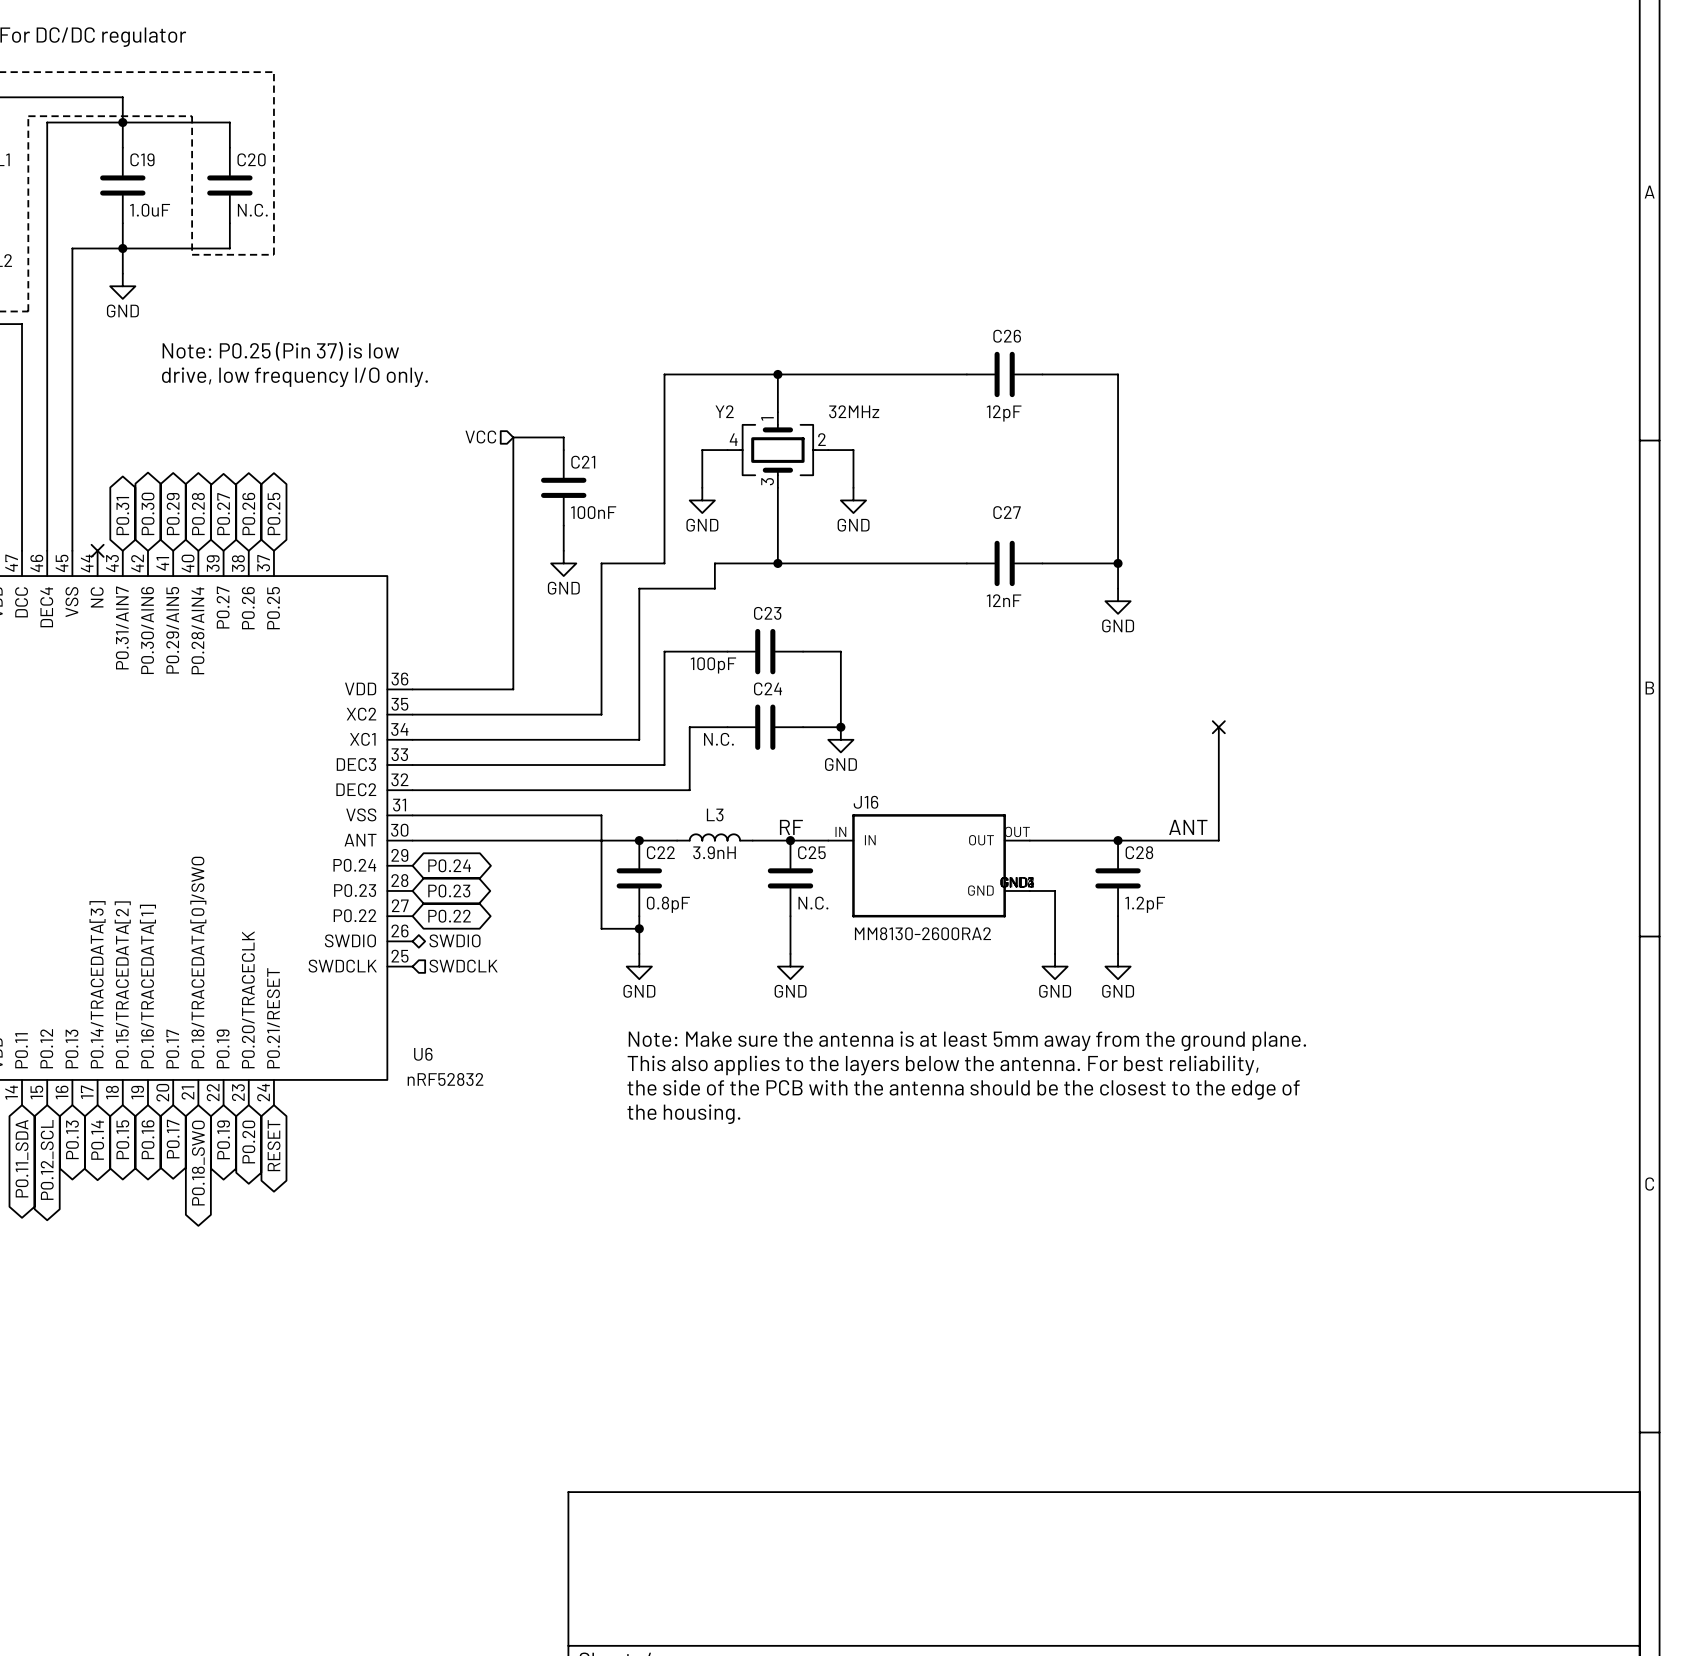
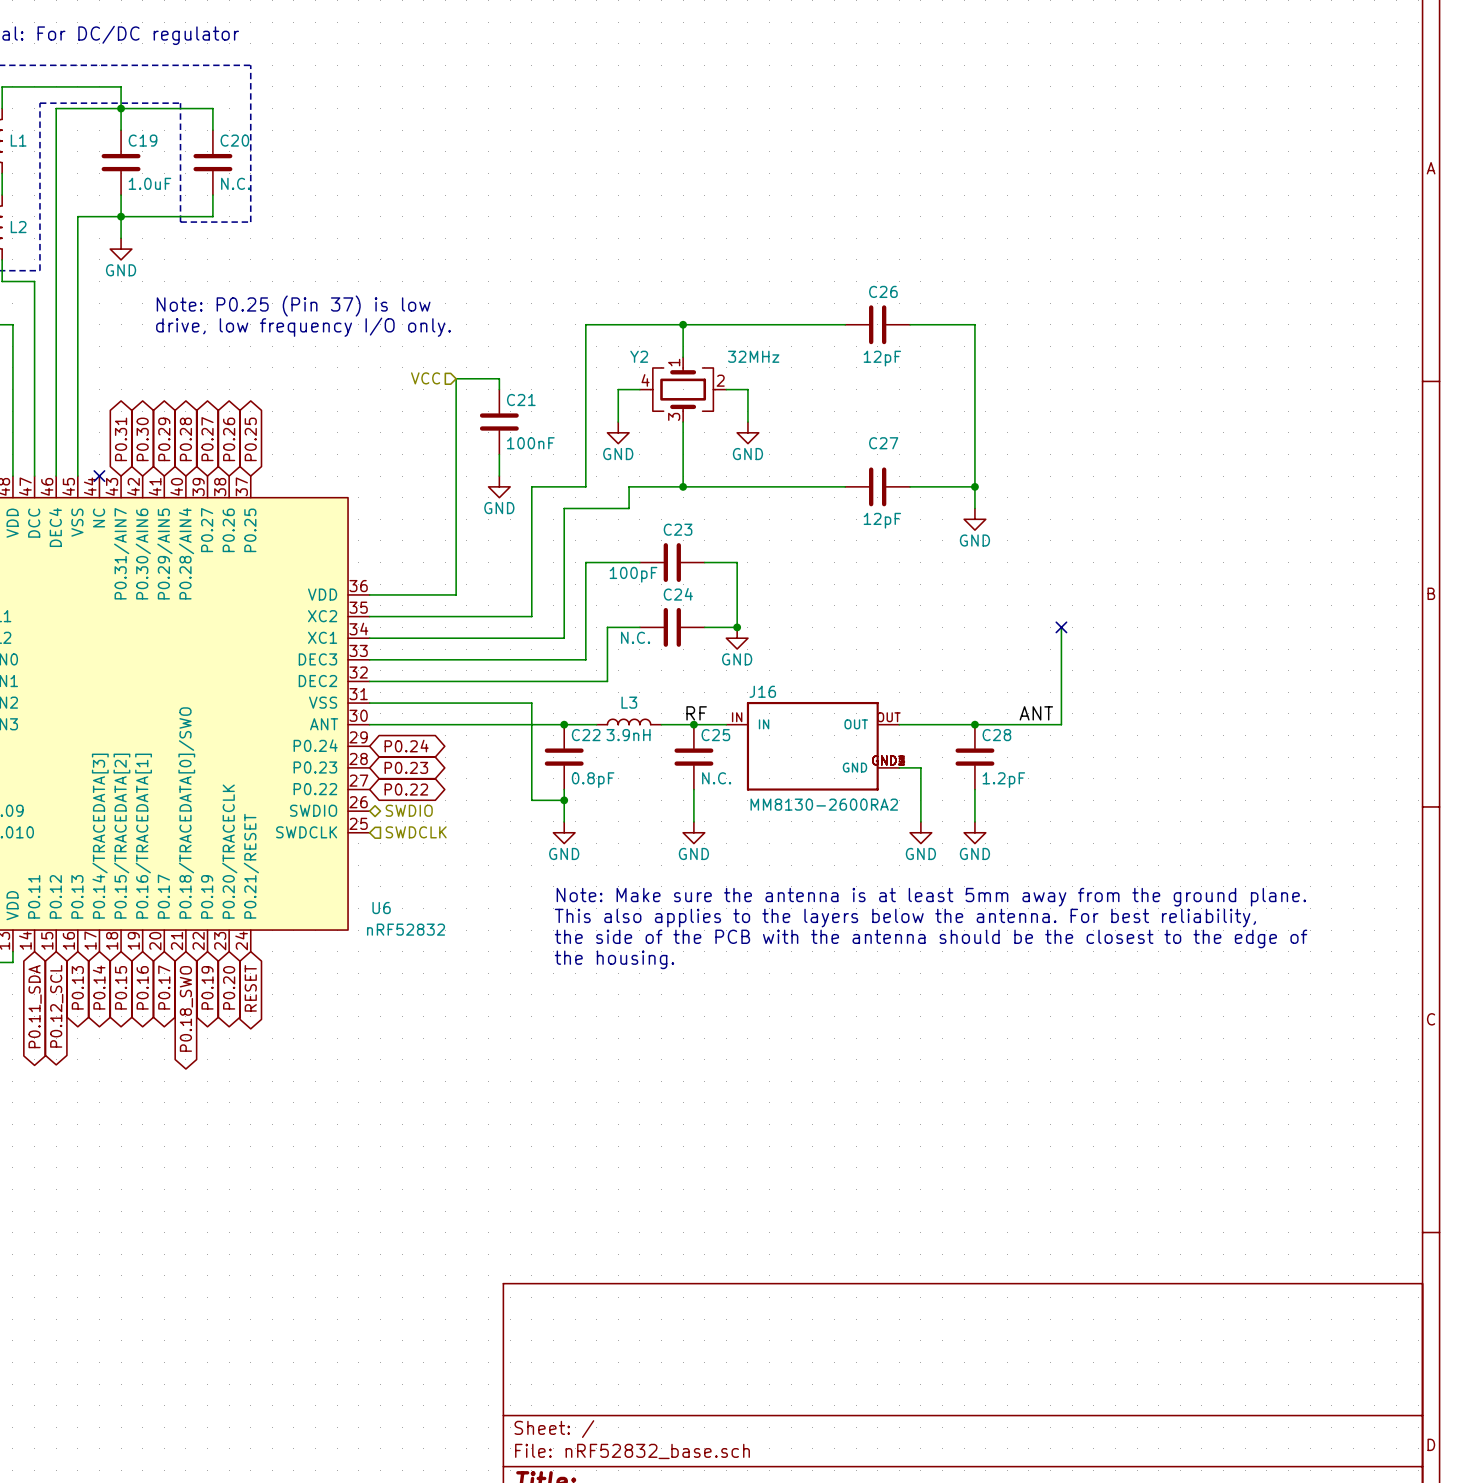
C27 value: 12nF (1004, 600) -> 12pF (882, 520)

